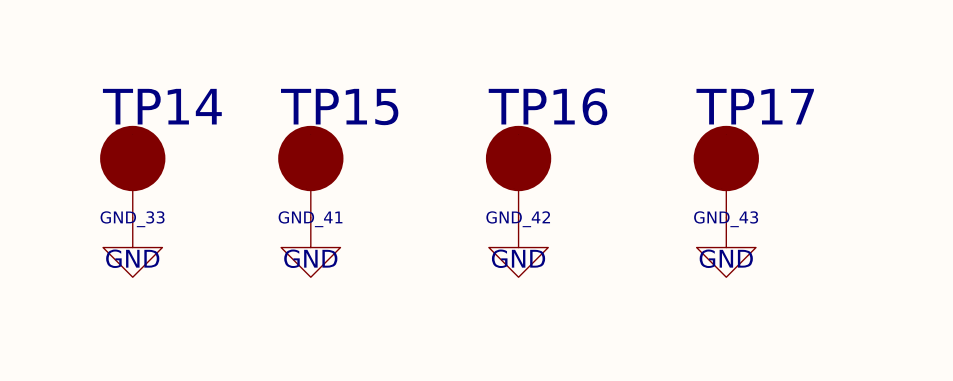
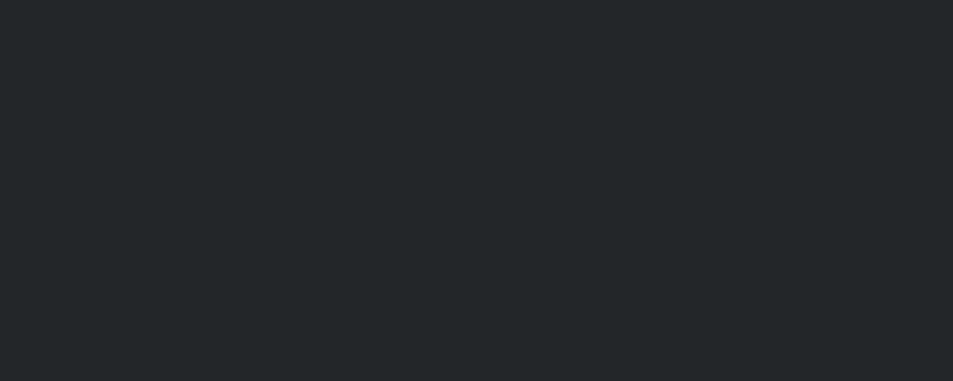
TP14: (132, 171) -> none
TP15: (310, 171) -> none
TP16: (518, 171) -> none
TP17: (726, 171) -> none
GND_33: GND (132, 247) -> none
GND_41: GND (310, 247) -> none
GND_42: GND (518, 247) -> none
GND_43: GND (726, 247) -> none

